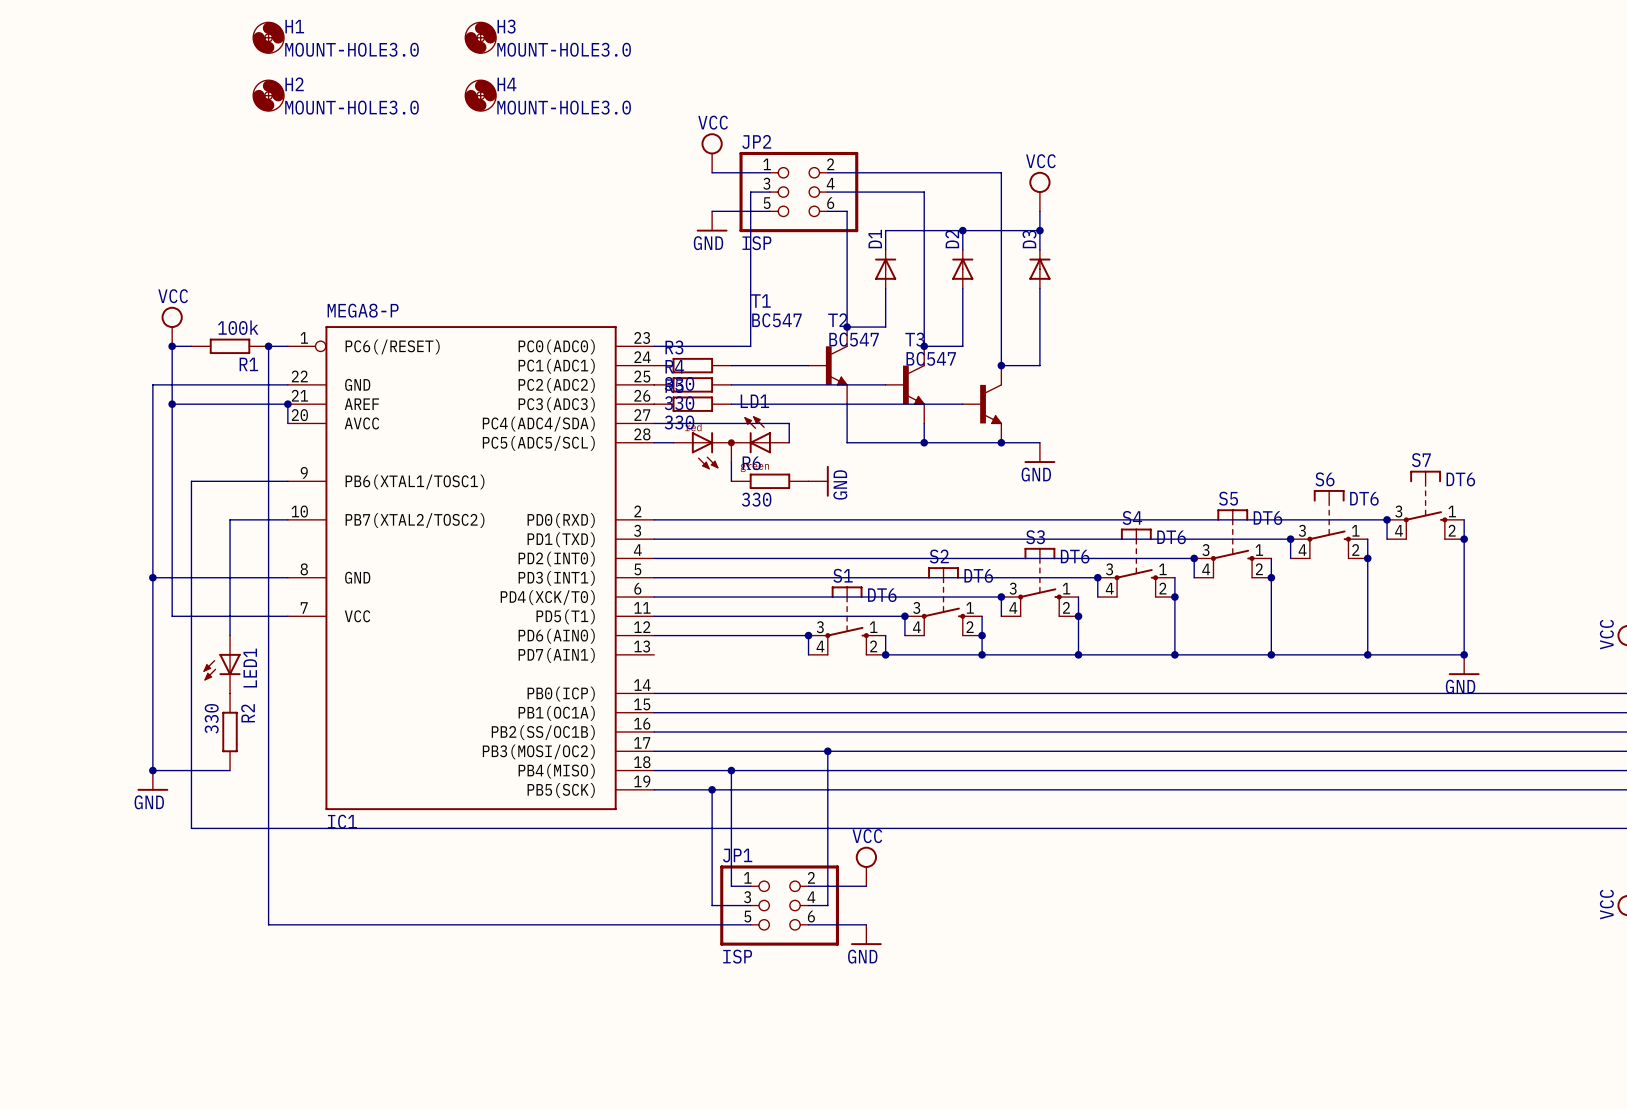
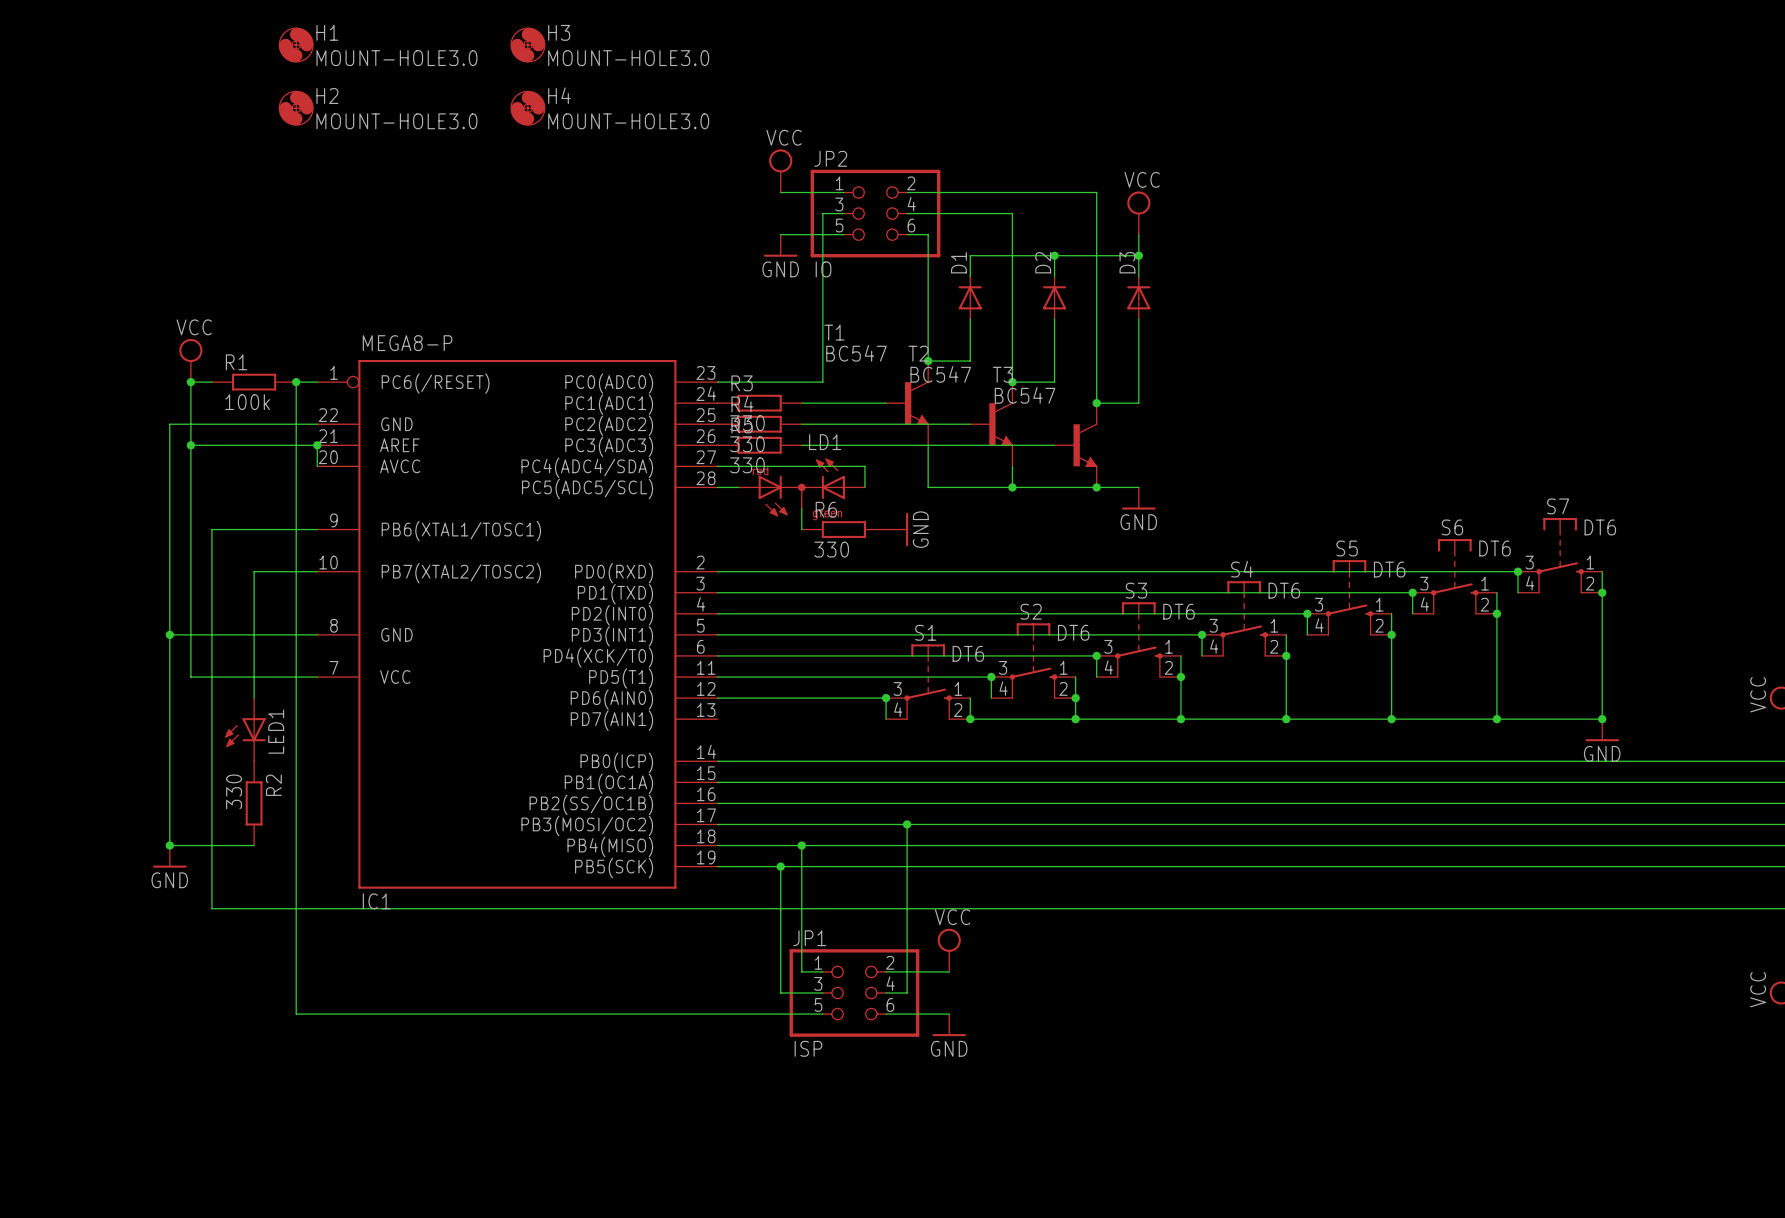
JP2 value: ISP (756, 243) -> IO (823, 269)
R1 value position: 100k (238, 327) -> 100k (247, 402)
R1 name position: R1 (248, 364) -> R1 (236, 362)

